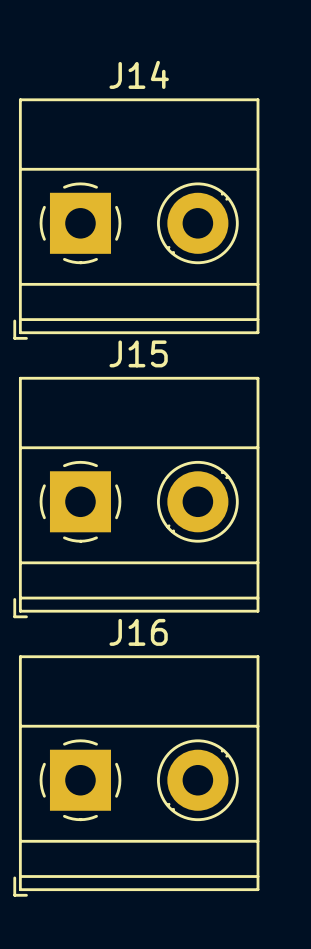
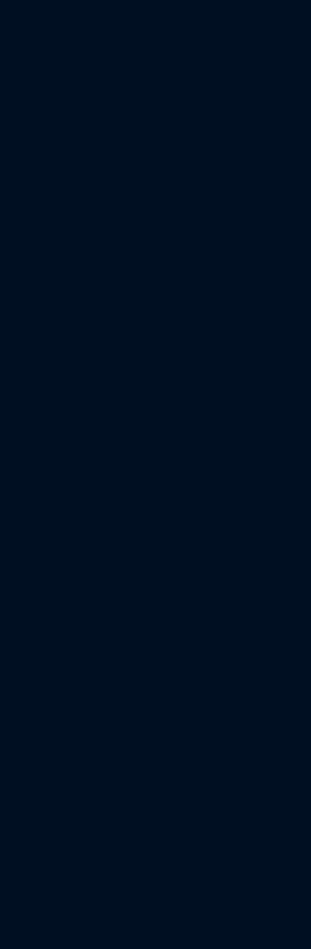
J14: (136, 219) -> none
J15: (136, 497) -> none
J16: (136, 776) -> none

